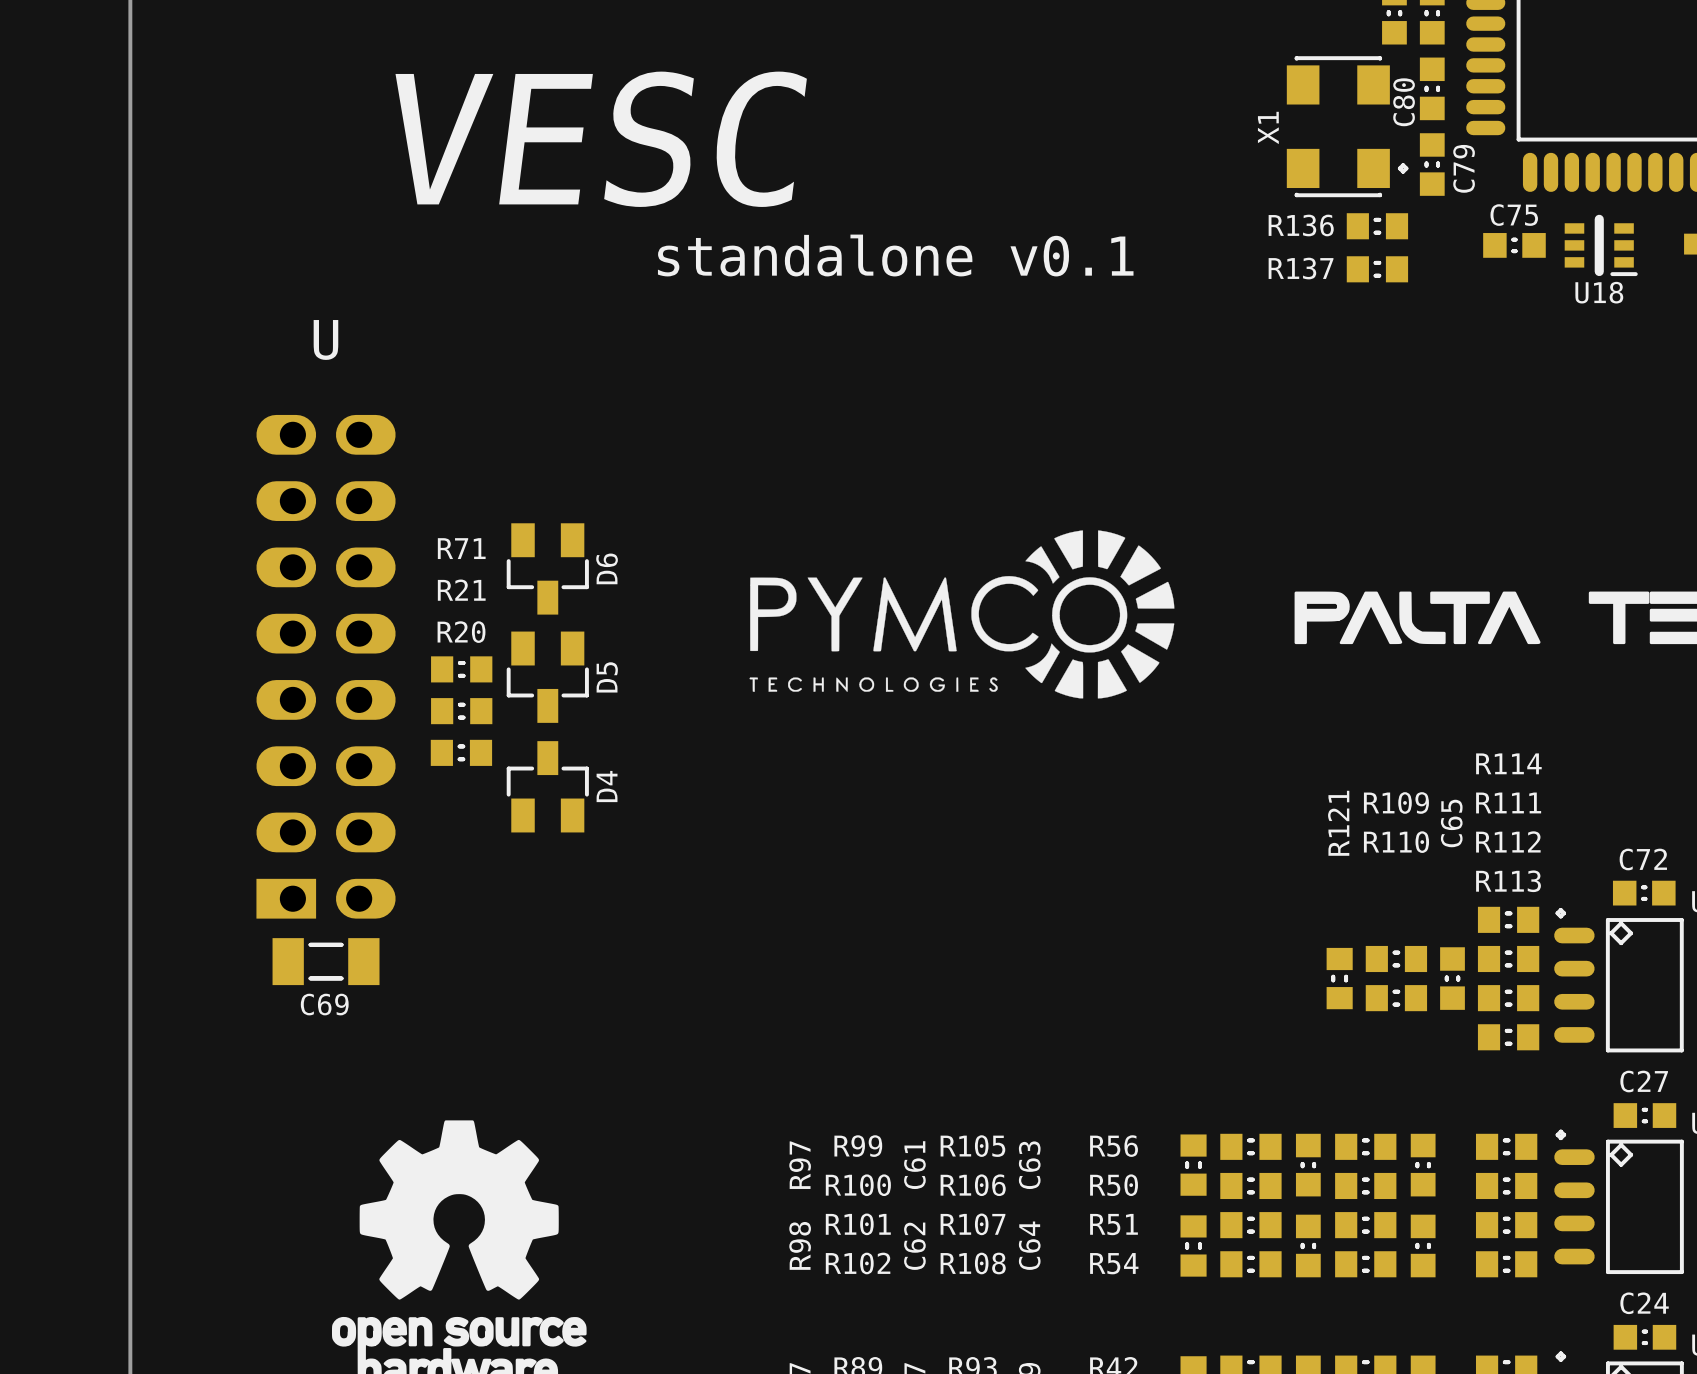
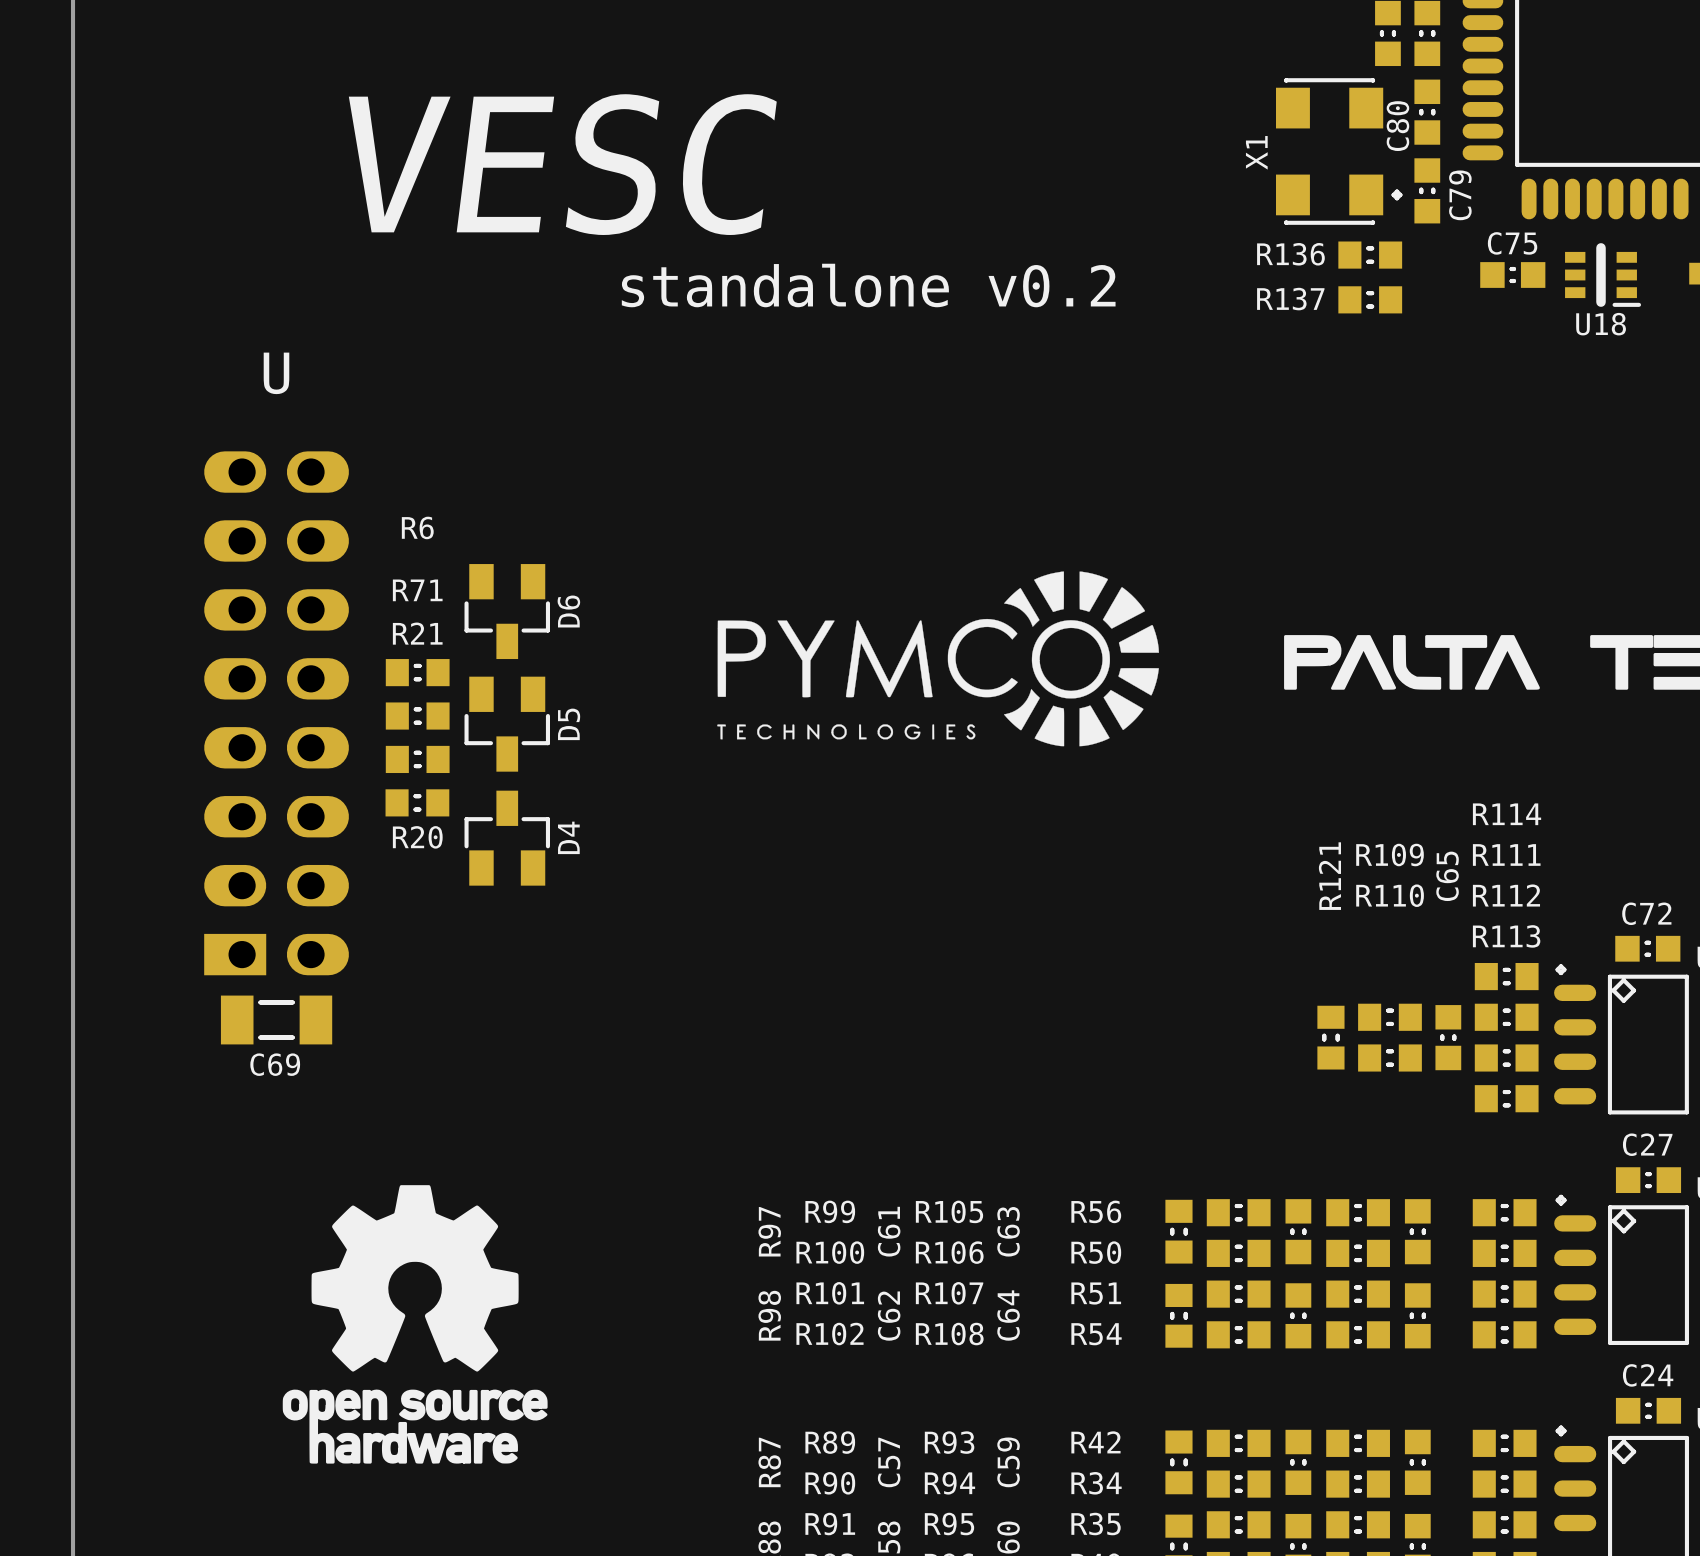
text: standalone v0.1 (895, 255) -> standalone v0.2 (868, 285)
R6: none -> (417, 672)
R20 name position: R20 (461, 632) -> R20 (417, 837)

